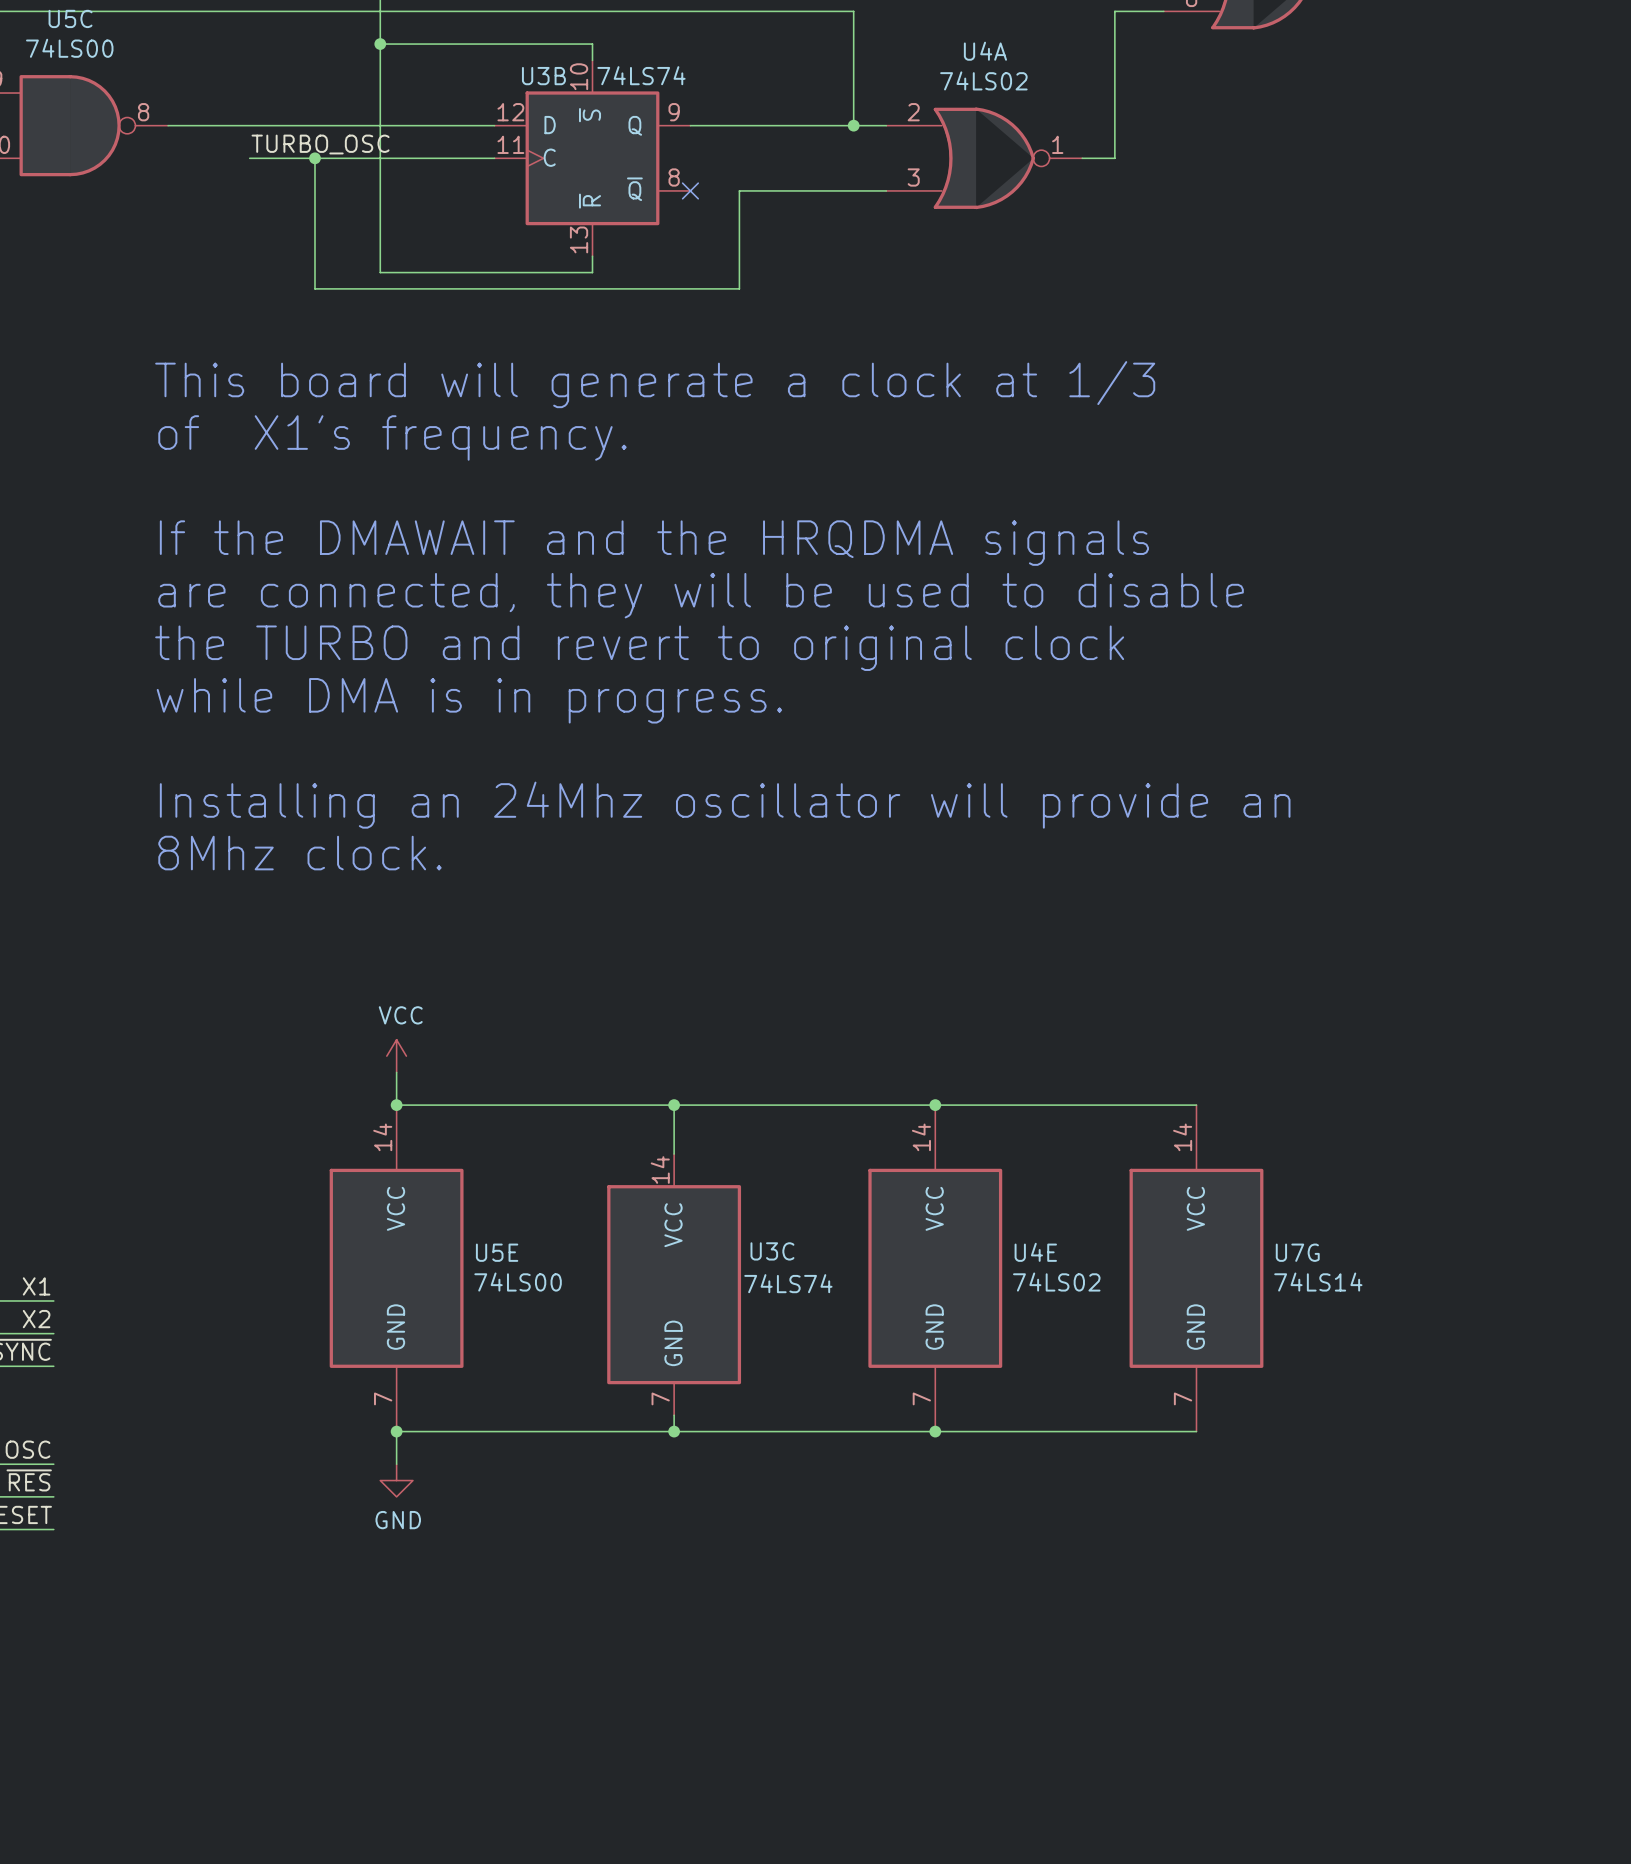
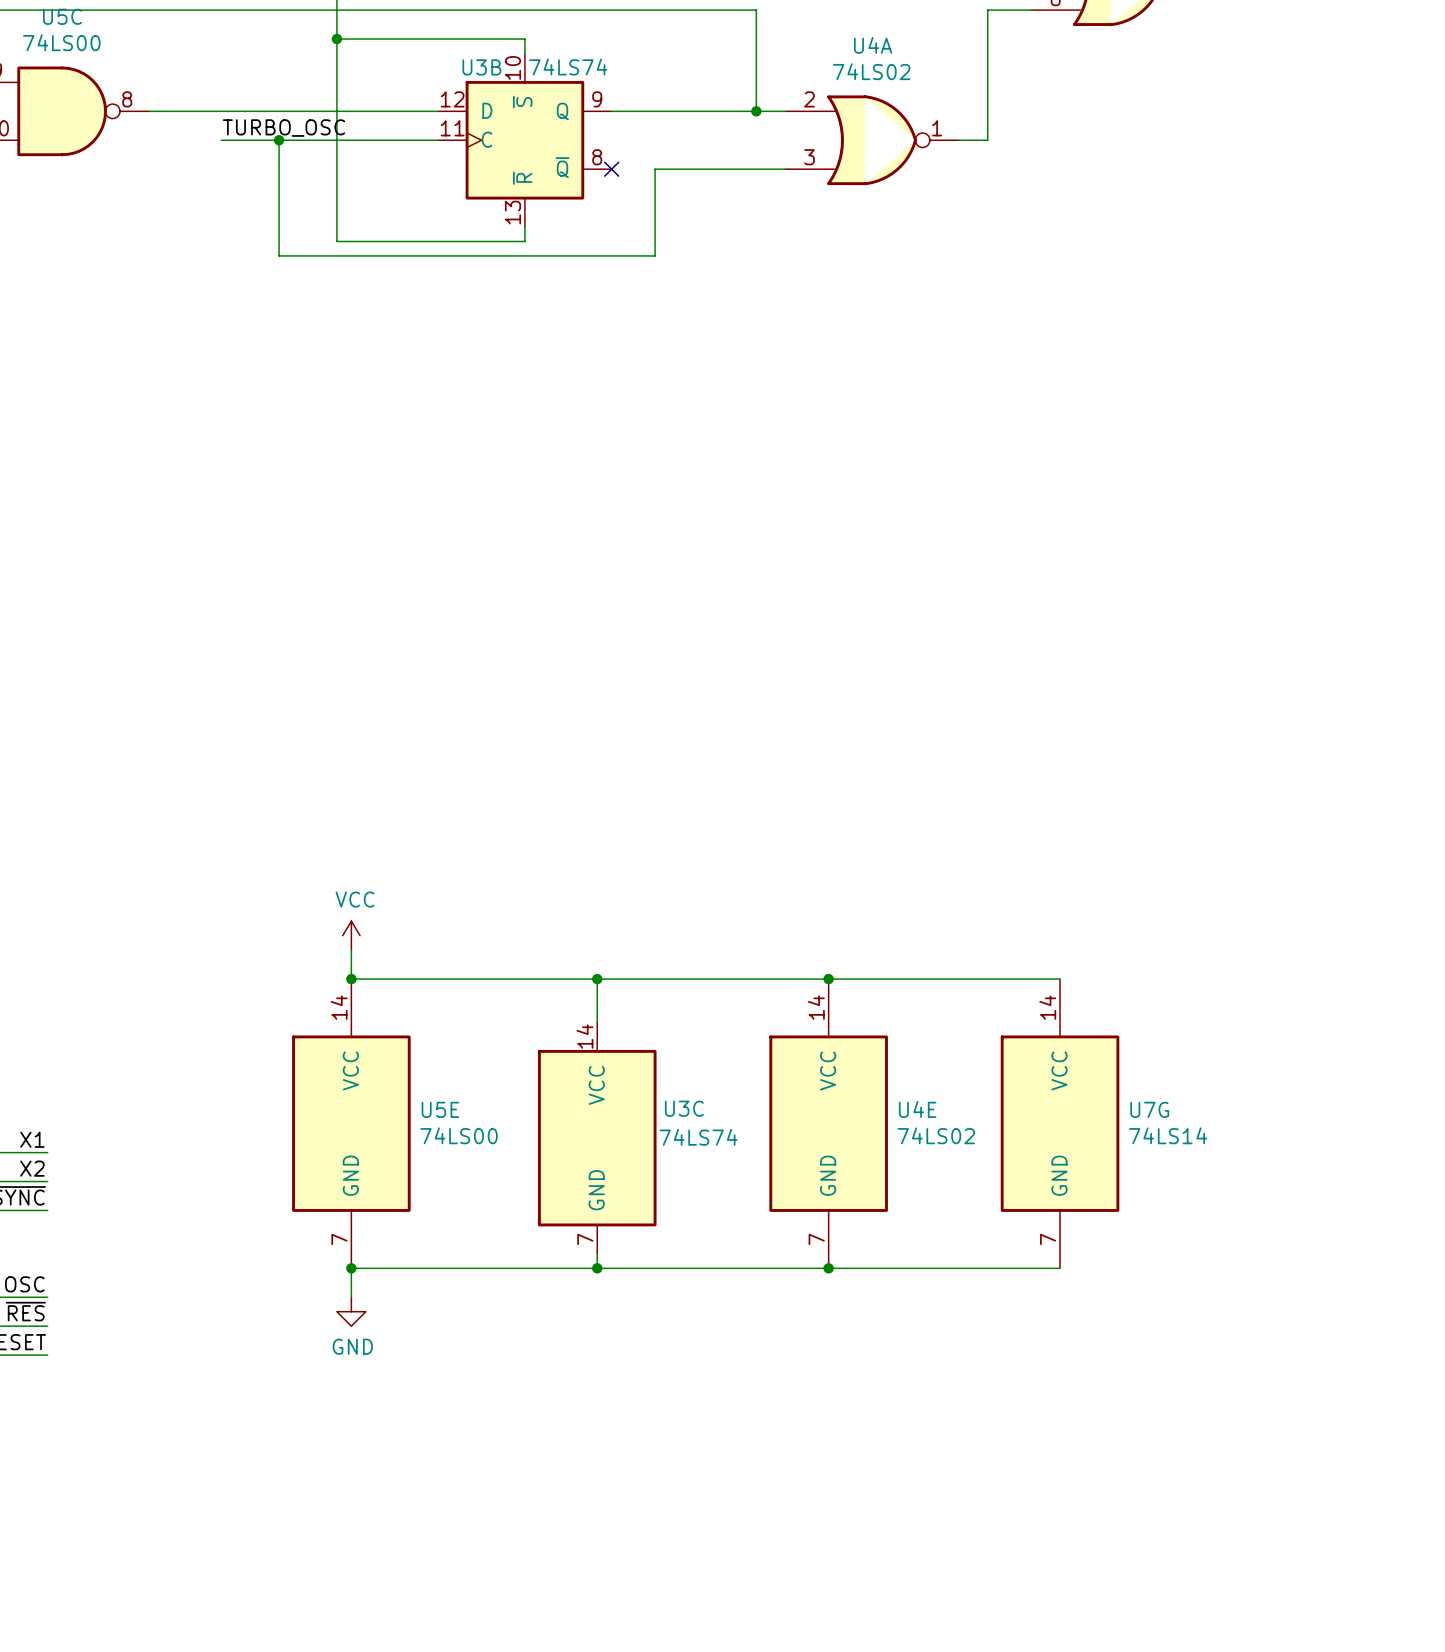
text: This board will generate a clock at 1/3 (655, 384) -> none
text: of X1's frequency. (392, 437) -> none
text: If the DMAWAIT and the HRQDMA signals (654, 543) -> none
text: are connected, they will be used to disable (701, 595) -> none
text: the TURBO and revert to original clock (639, 648) -> none
text: while DMA is in progress. (469, 700) -> none
text: Installing an 24Mhz oscillator will provide an (725, 805) -> none
text: 8Mhz clock. (299, 853) -> none

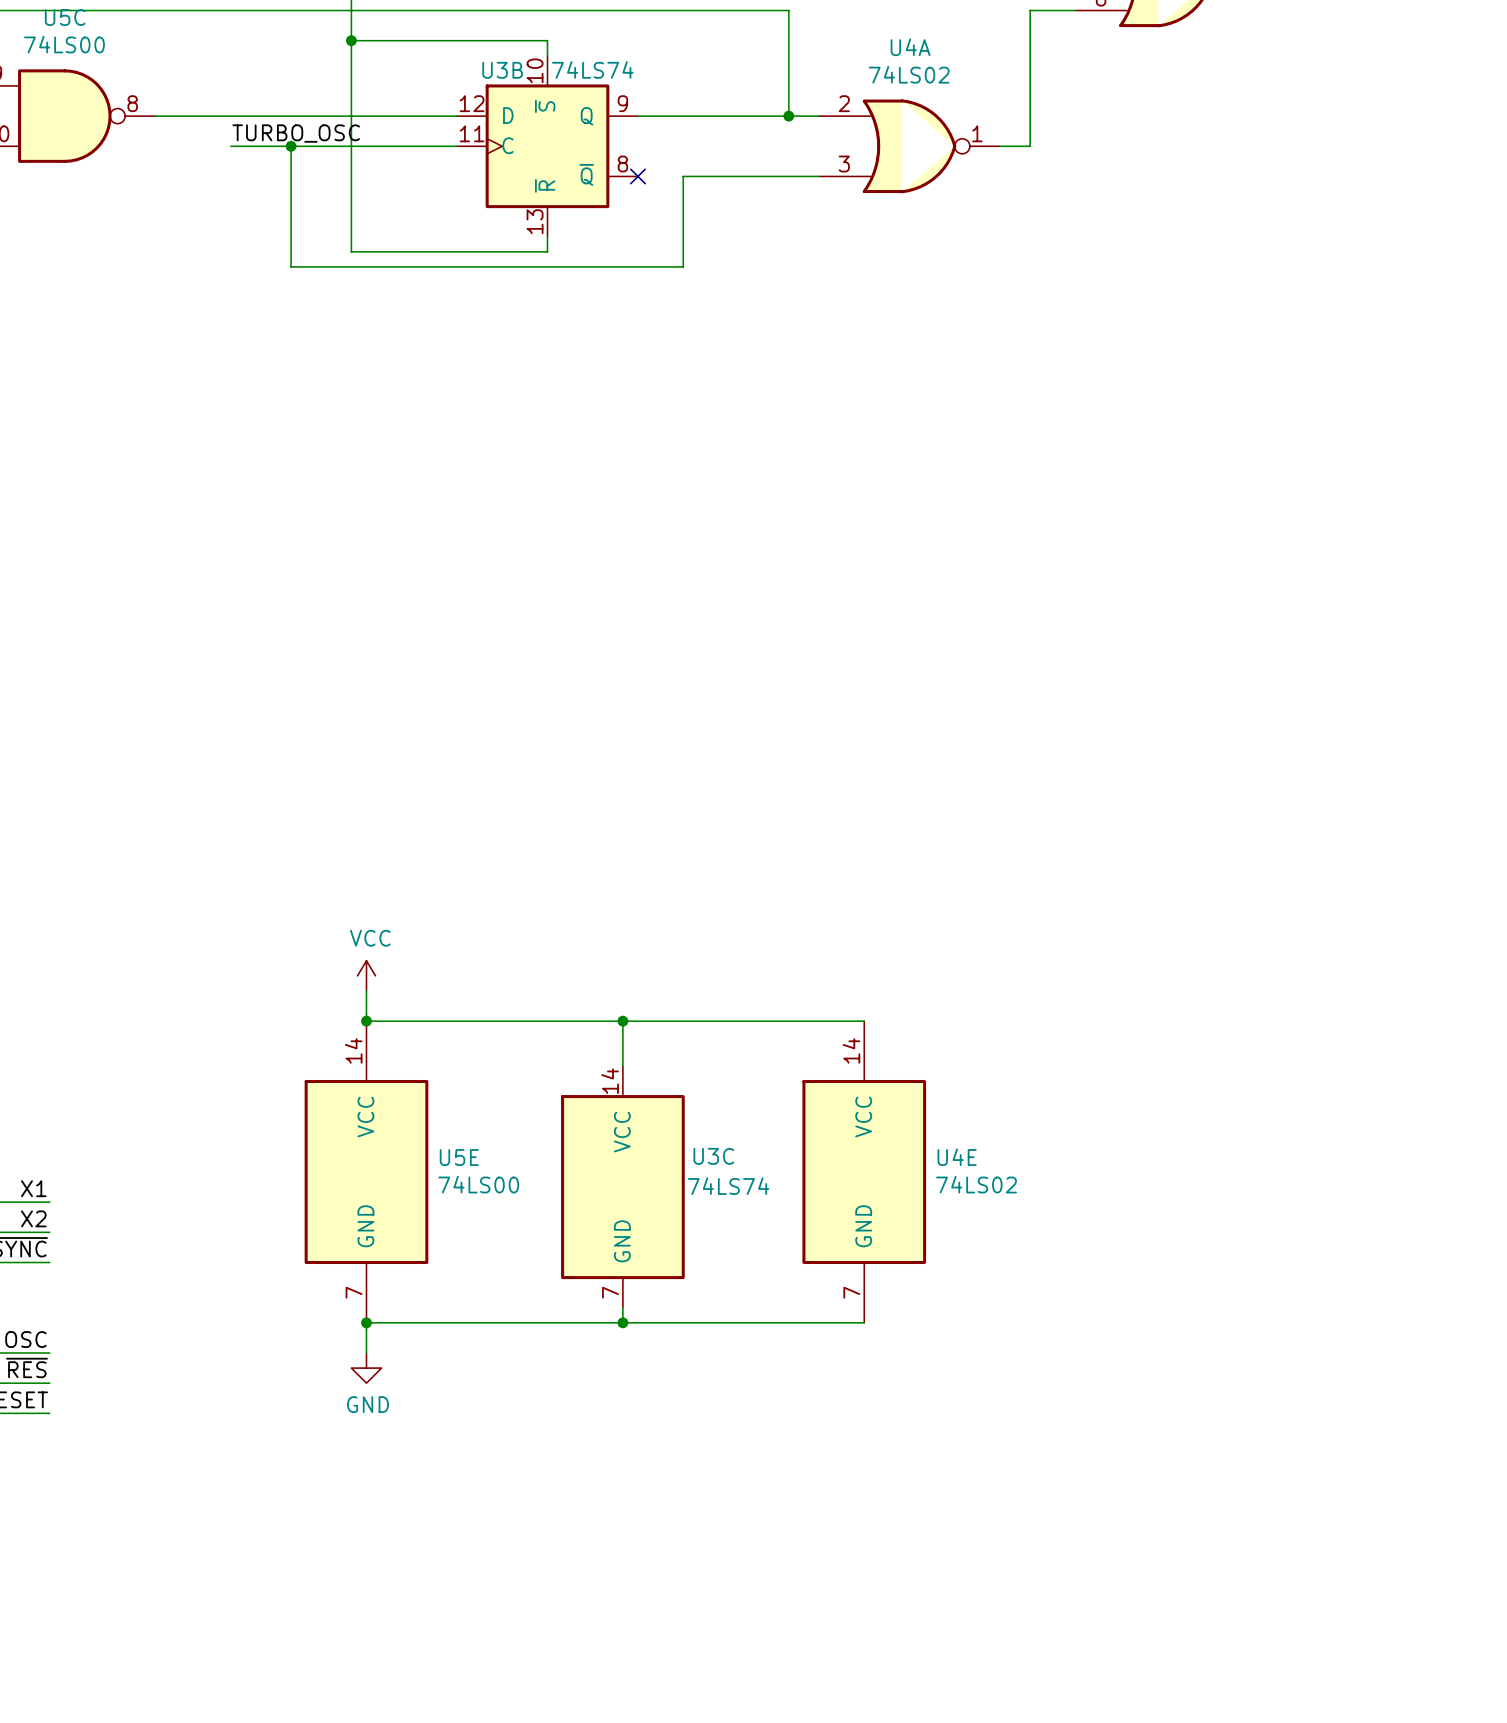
wire: (828, 979) (1060, 979) -> none
junction: (828, 979) -> none
U7G: 74LS14 (1060, 1123) -> none
wire: (828, 1268) (1060, 1268) -> none
junction: (828, 1268) -> none

